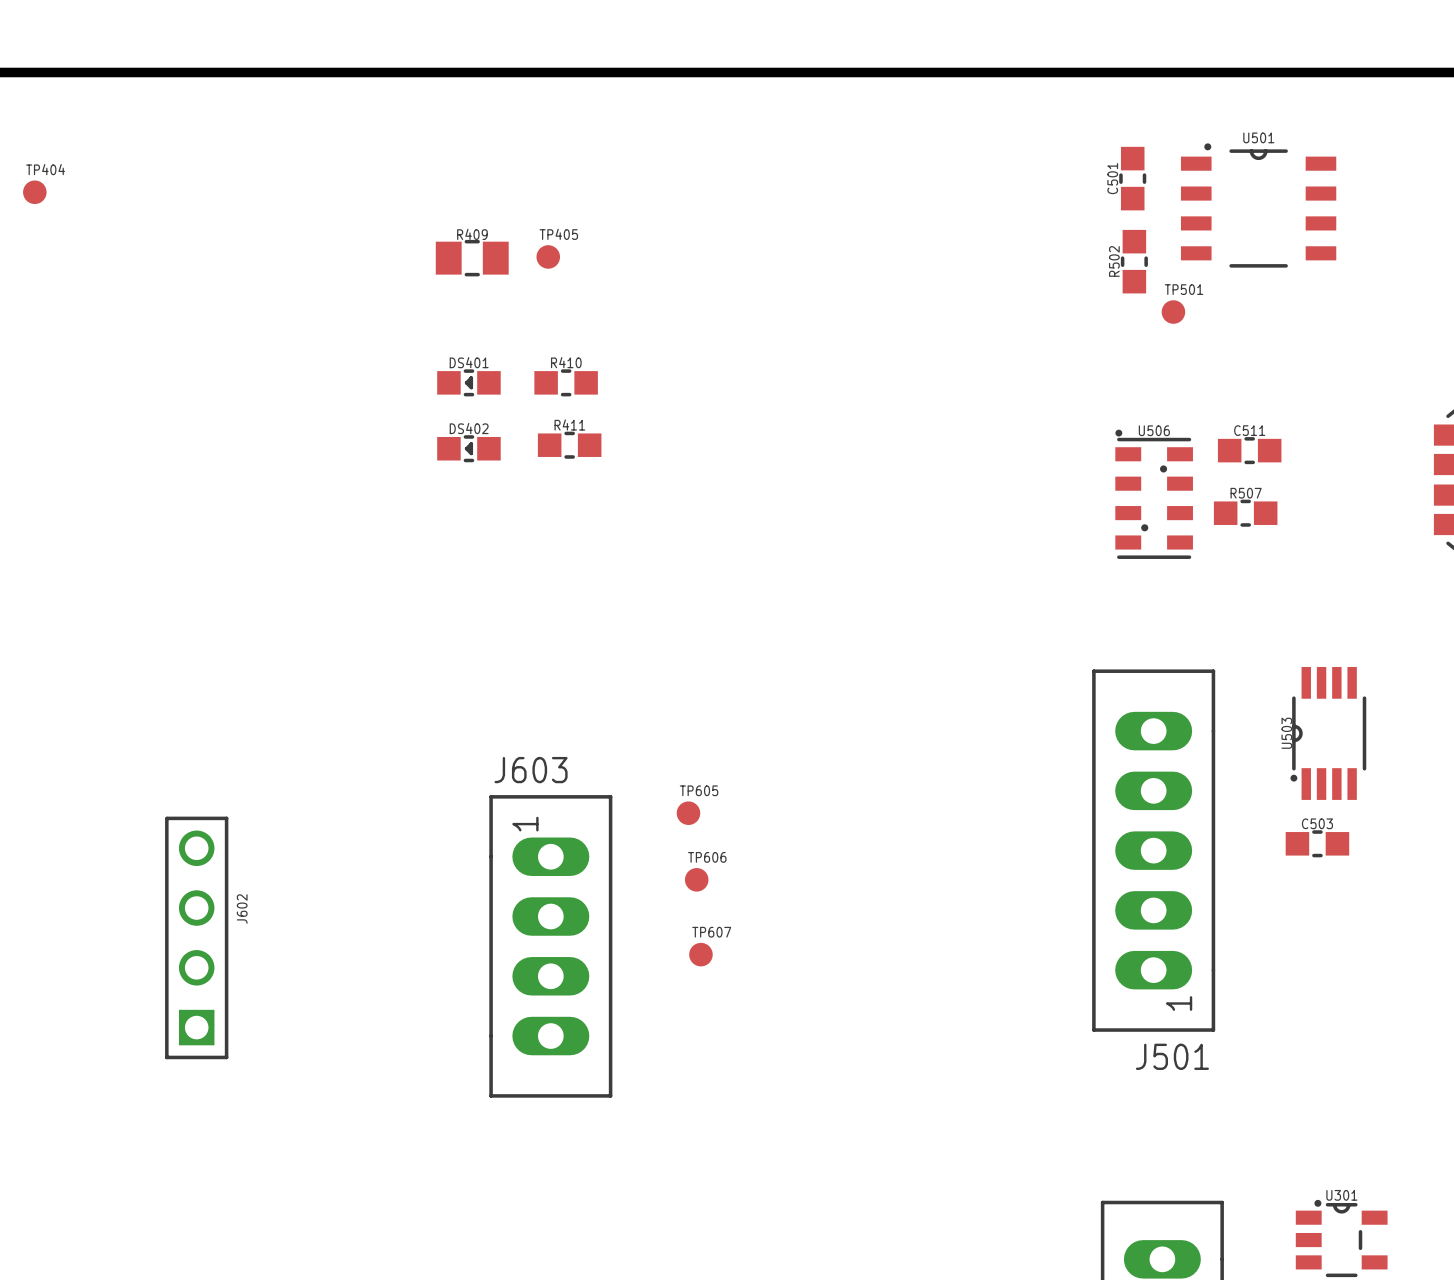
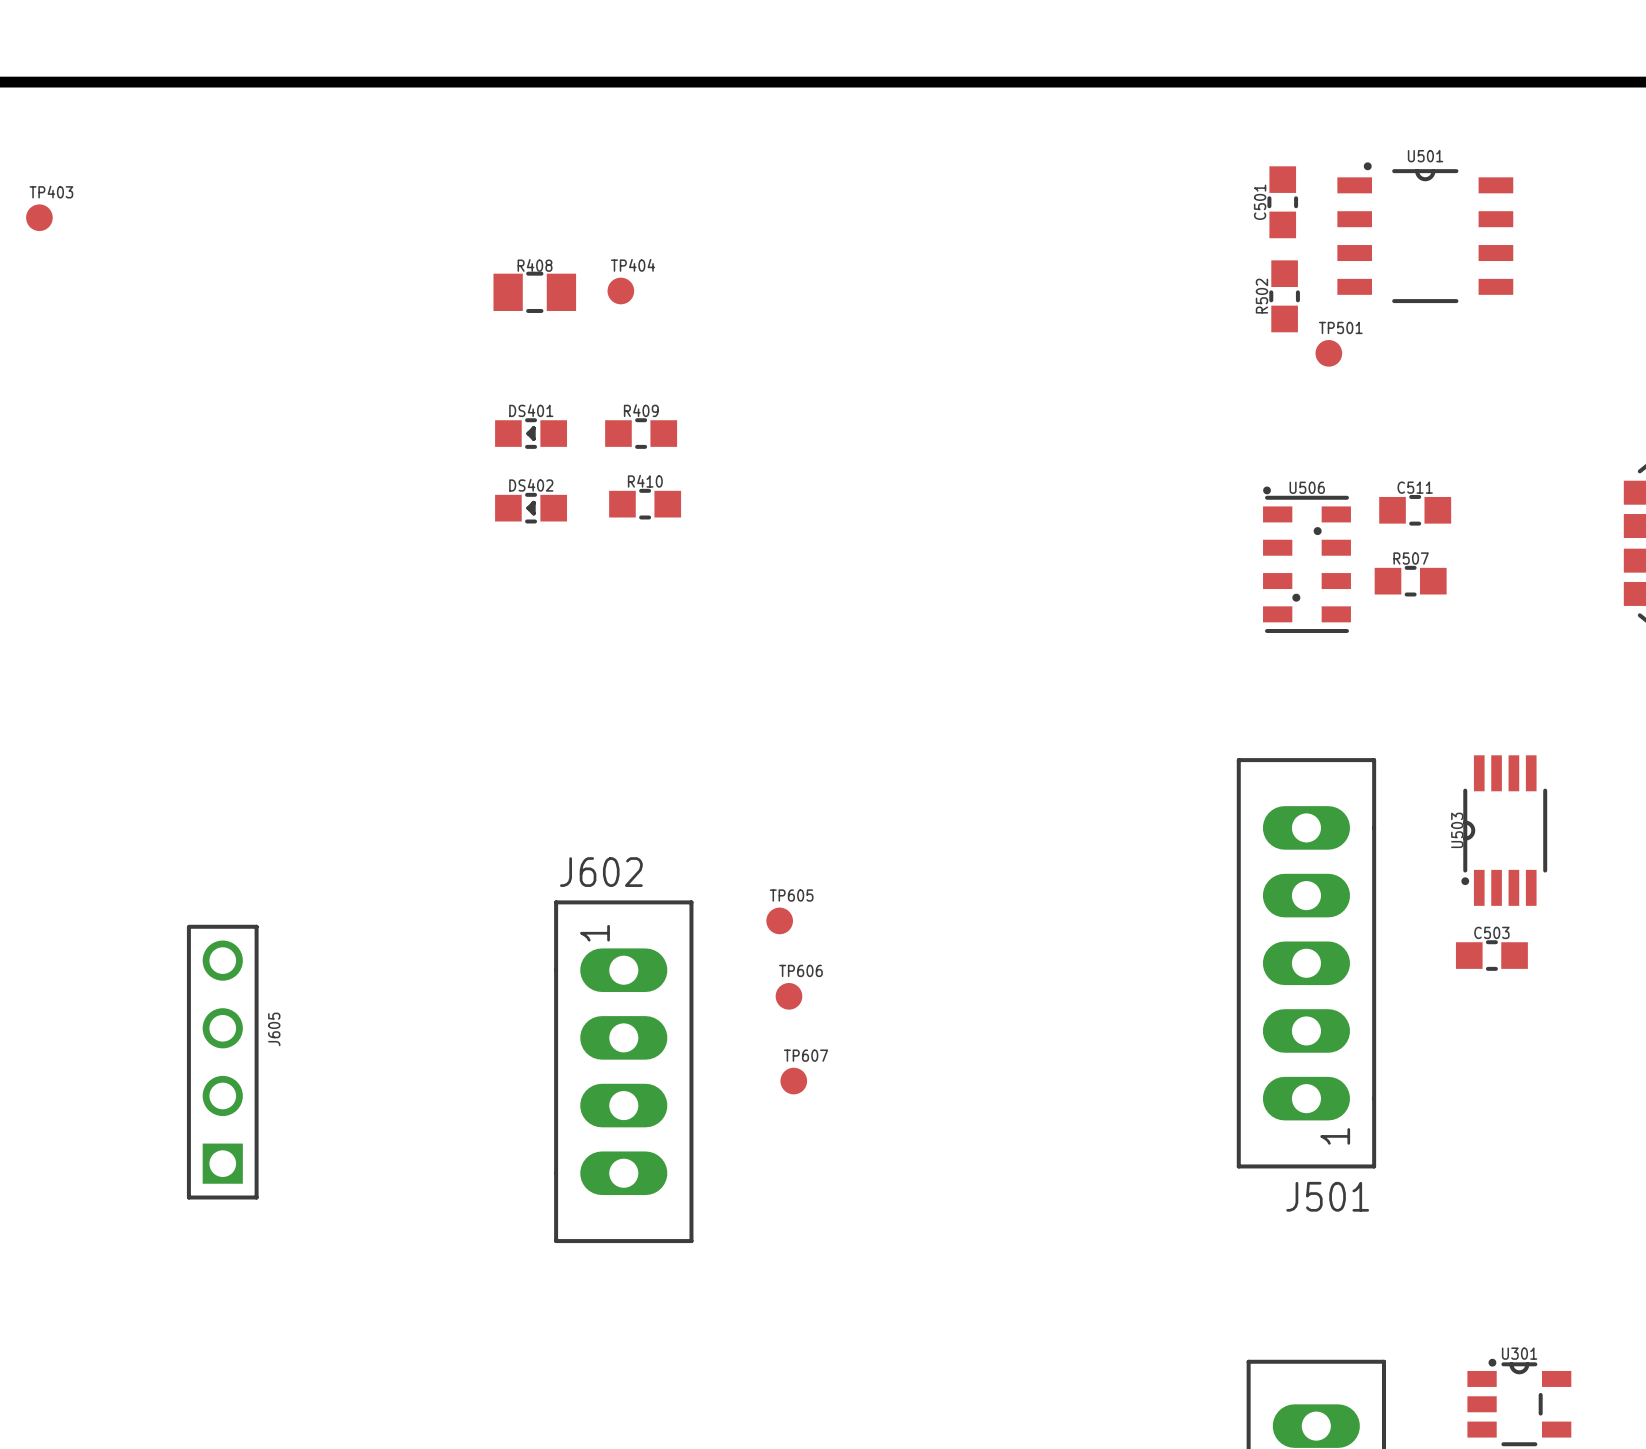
TP404 name: TP404 (45, 169) -> TP403 (51, 192)
R409 name: R409 (472, 234) -> R408 (535, 265)
TP405 name: TP405 (558, 234) -> TP404 (633, 265)
R410 name: R410 (566, 362) -> R409 (641, 410)
R411 name: R411 (569, 424) -> R410 (645, 481)
J603 name: J603 (531, 770) -> J602 (601, 872)
J602 name: J602 (242, 909) -> J605 (274, 1029)

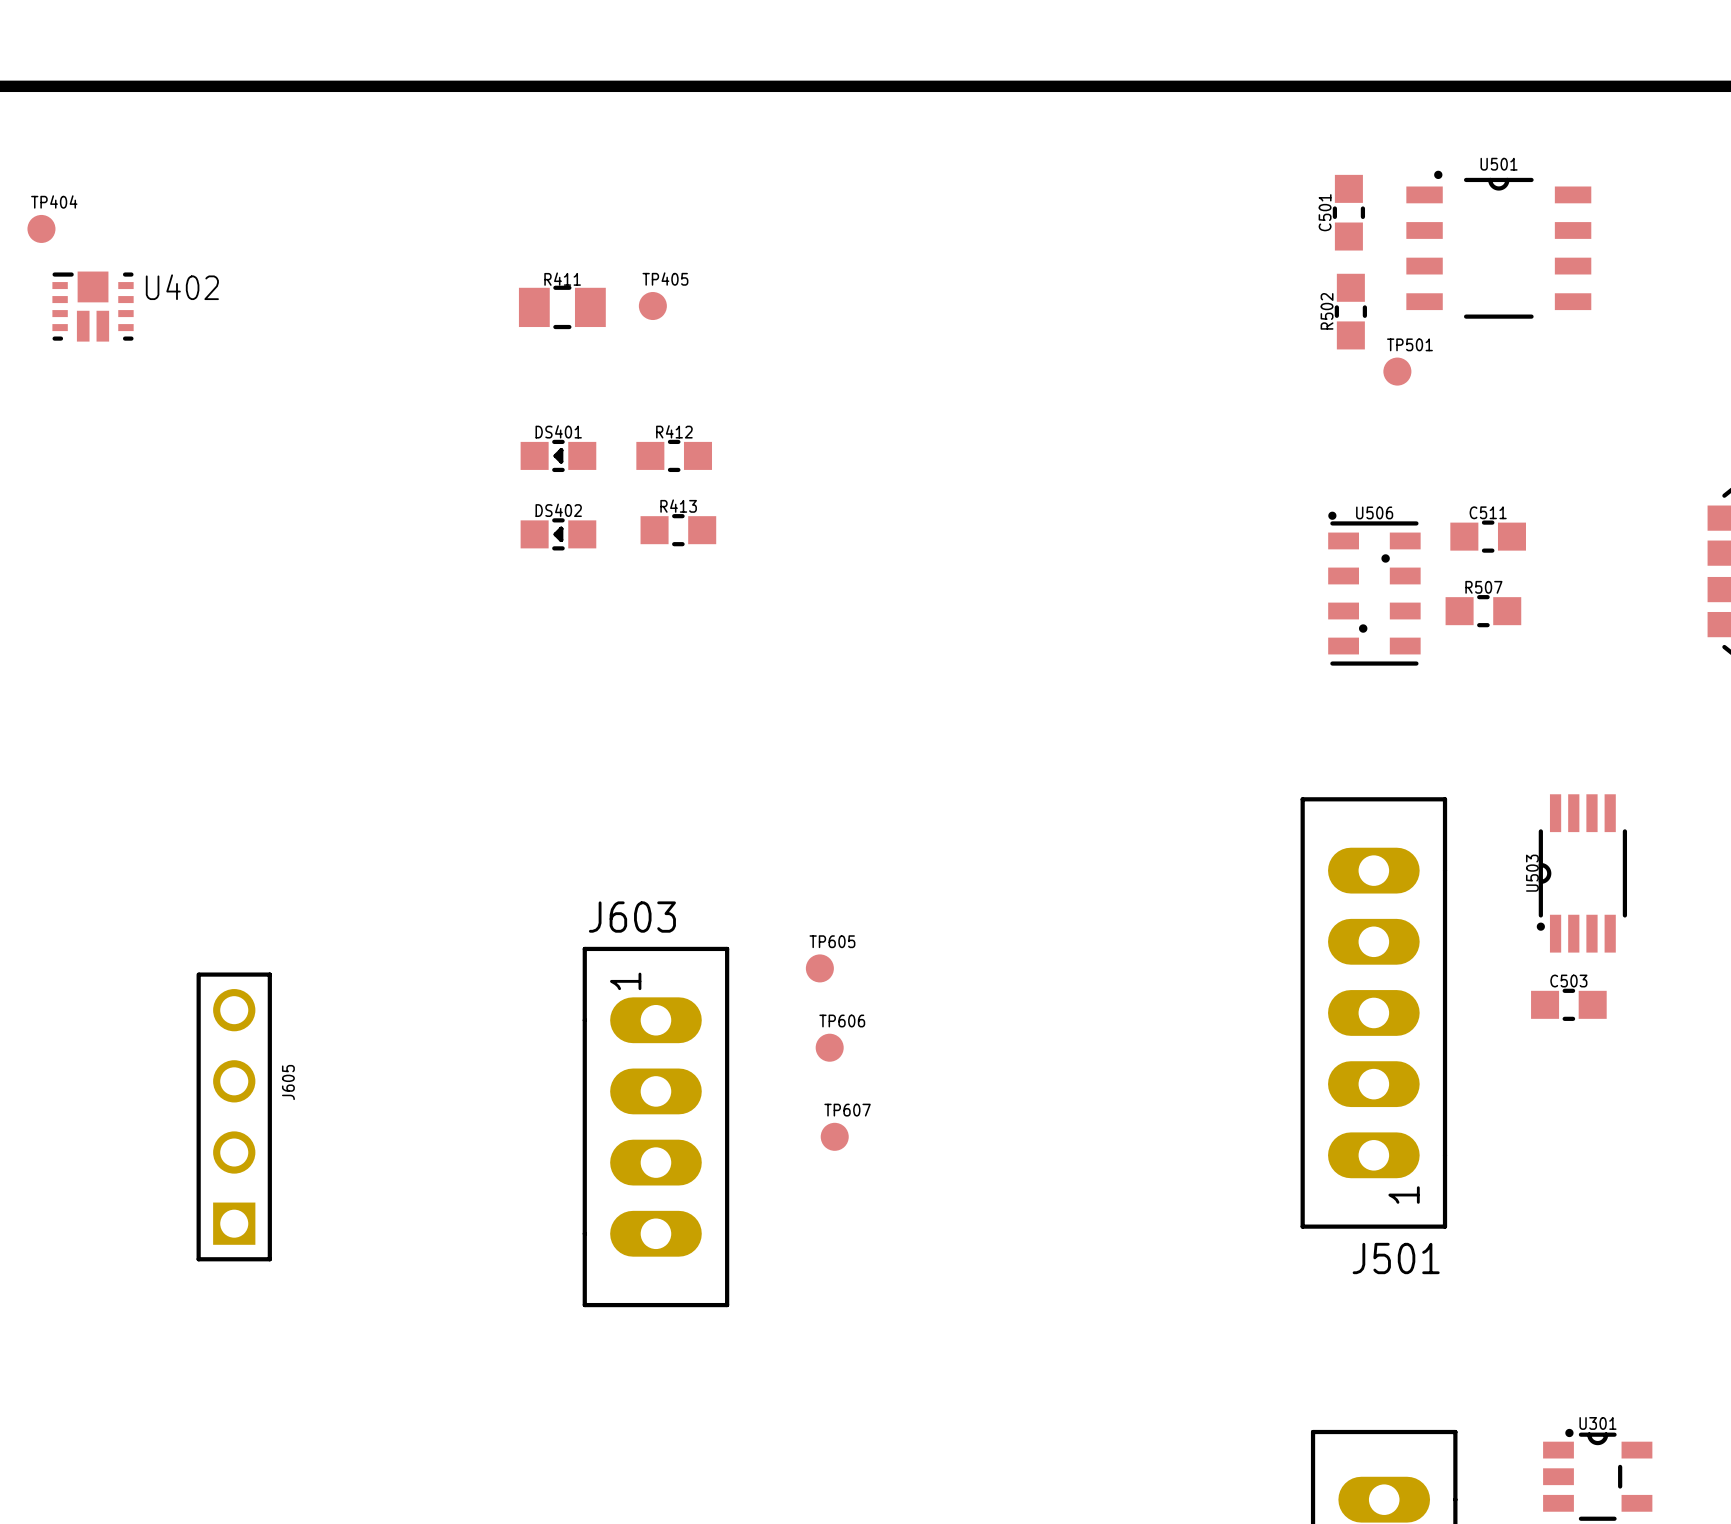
TP403 name: TP403 (51, 192) -> TP404 (54, 201)
R408 name: R408 (535, 265) -> R411 (562, 279)
TP404 name: TP404 (633, 265) -> TP405 (665, 279)
U402: none -> (93, 306)
R409 name: R409 (641, 410) -> R412 (674, 431)
R410 name: R410 (645, 481) -> R413 (678, 506)
J602 name: J602 (601, 872) -> J603 (632, 917)

